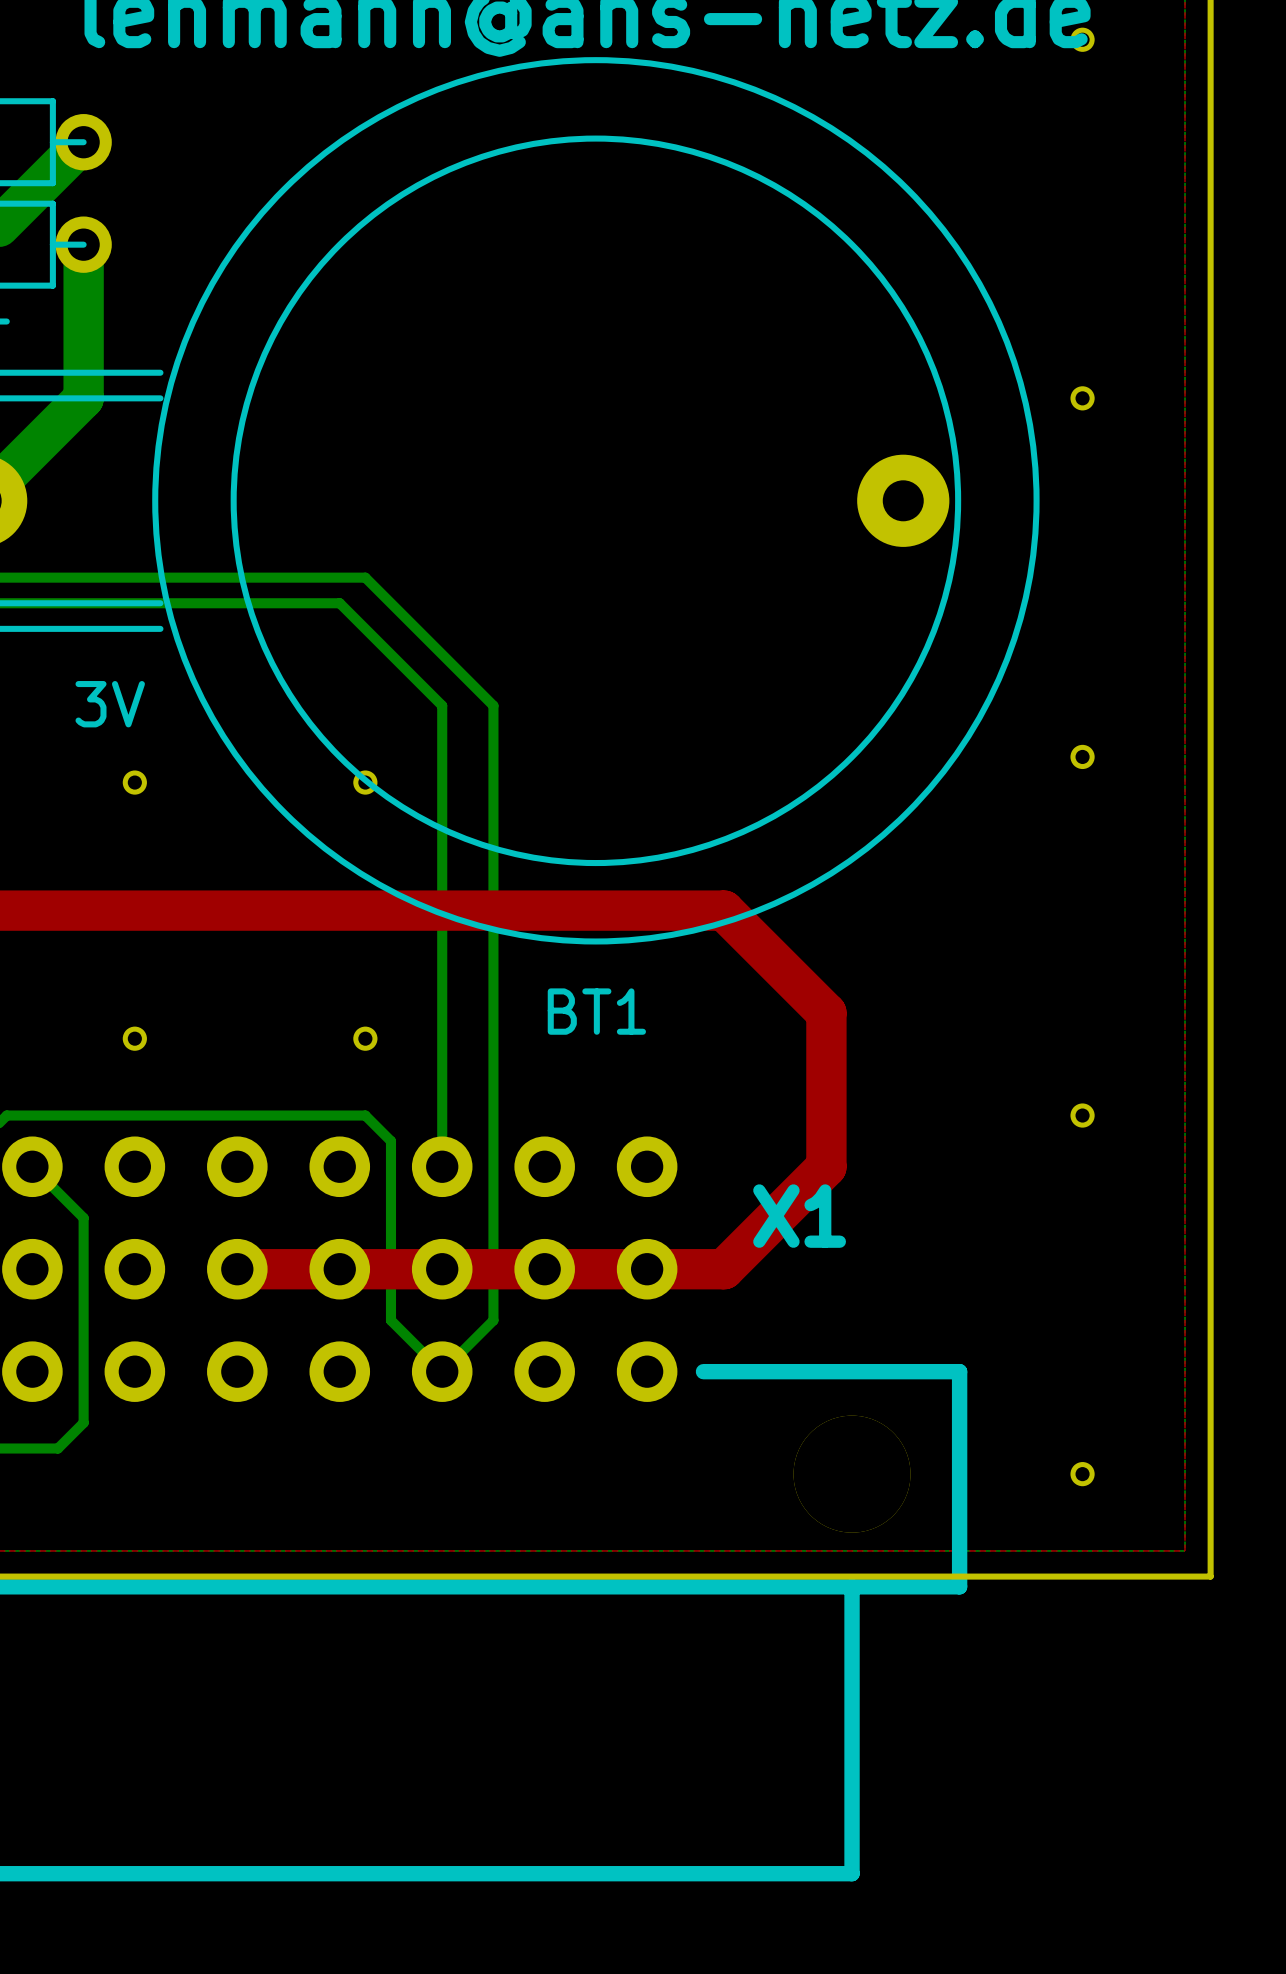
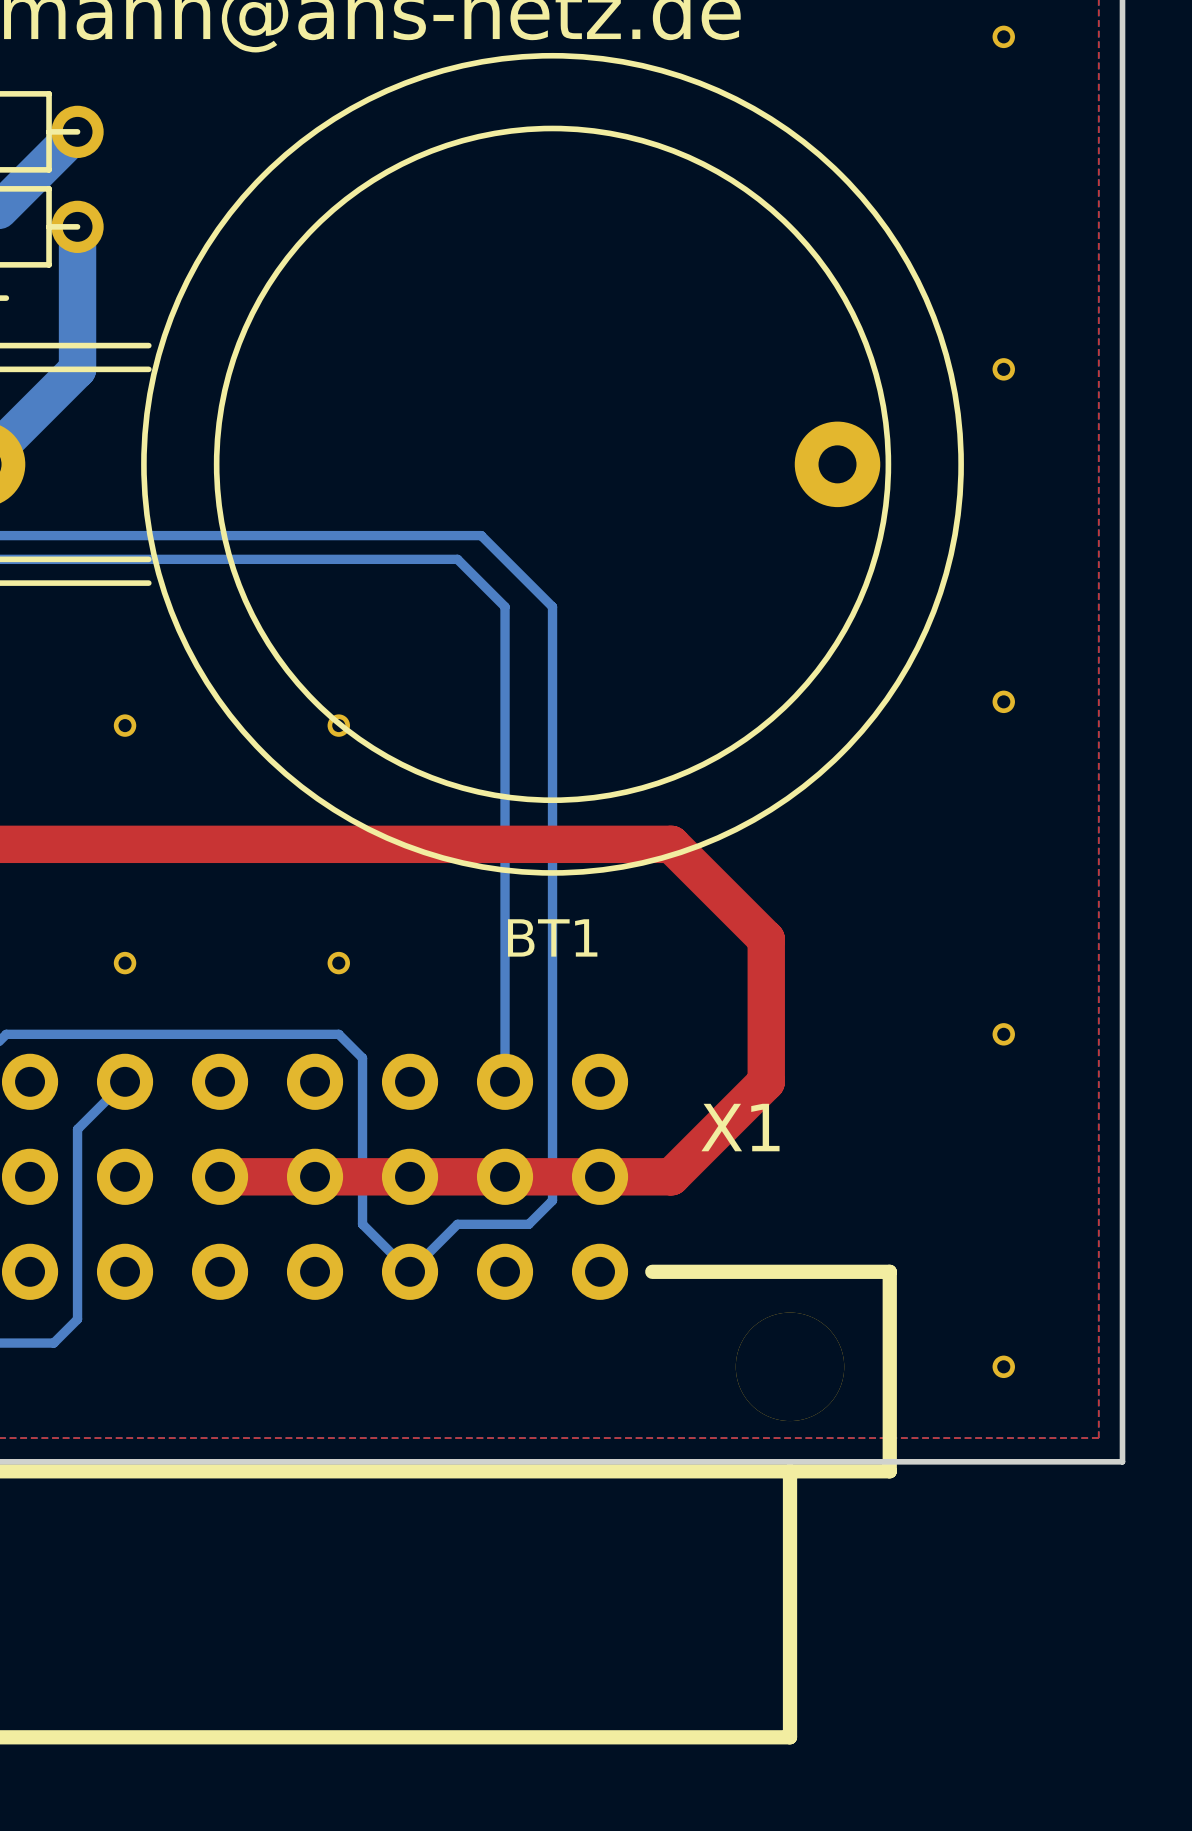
bottom track: (365, 577) (493, 705) (493, 1320) -> (338, 535) (481, 535) (552, 606) (552, 1200) (528, 1224) (457, 1224)
bottom track: (339, 603) (442, 705) (442, 1166) -> (315, 559) (457, 559) (505, 606) (505, 1081)
BT1 value: 3V (110, 704) -> none
bottom track: (32, 1166) (83, 1217) -> (125, 1081) (77, 1129)

